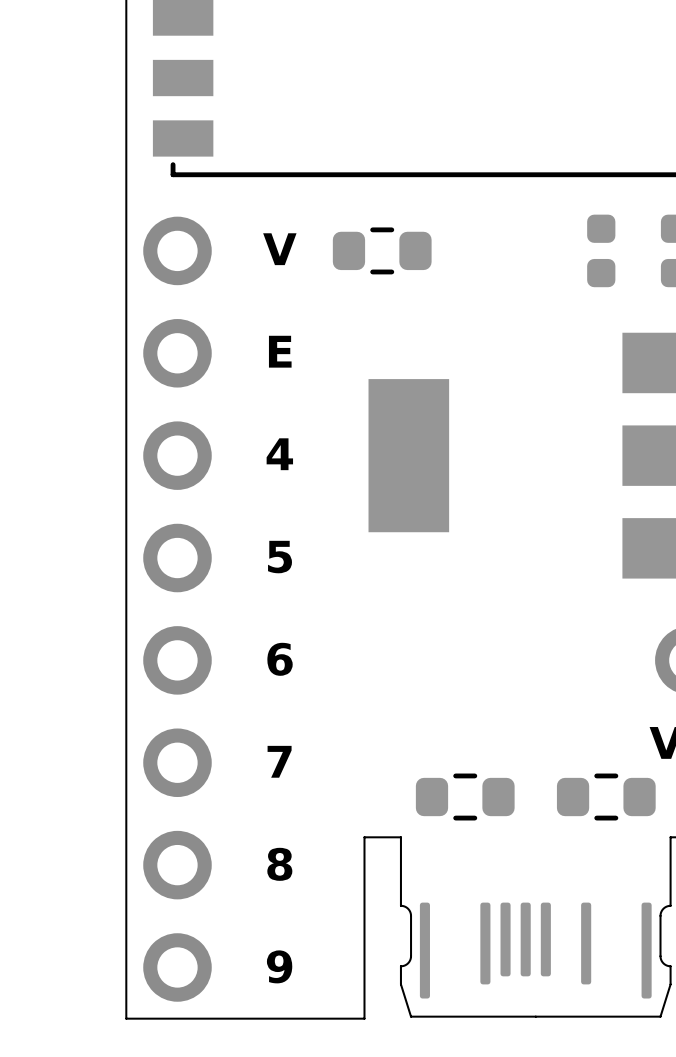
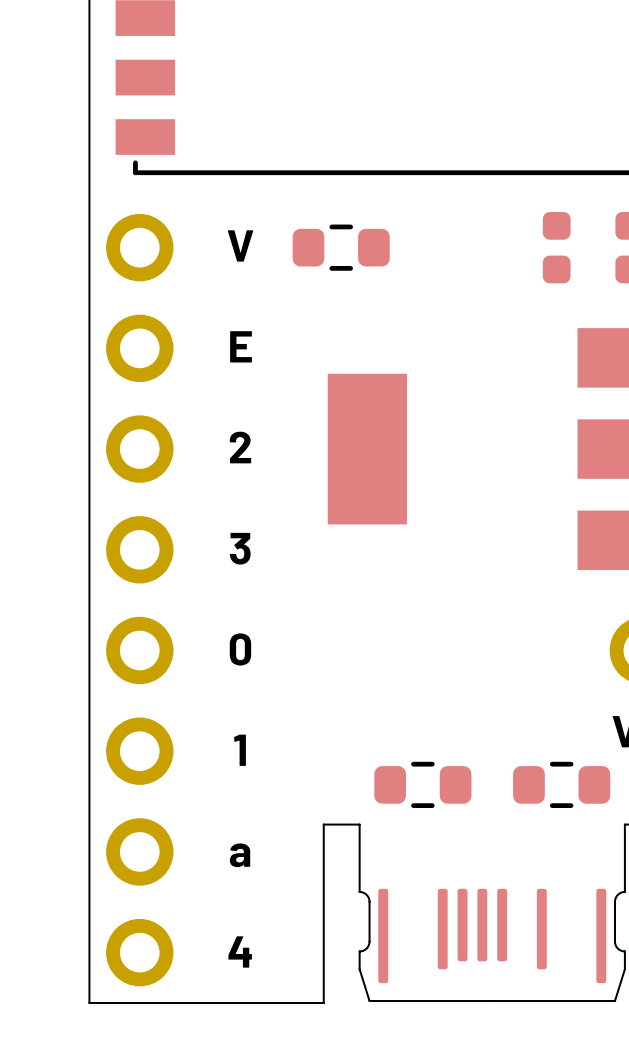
text: 4 (279, 454) -> 2 (240, 447)
text: 5 (280, 557) -> 3 (240, 548)
text: 6 (280, 659) -> 0 (240, 649)
text: 7 (279, 761) -> 1 (240, 750)
text: 8 (279, 864) -> a (239, 855)
text: 9 (279, 966) -> 4 (240, 951)

